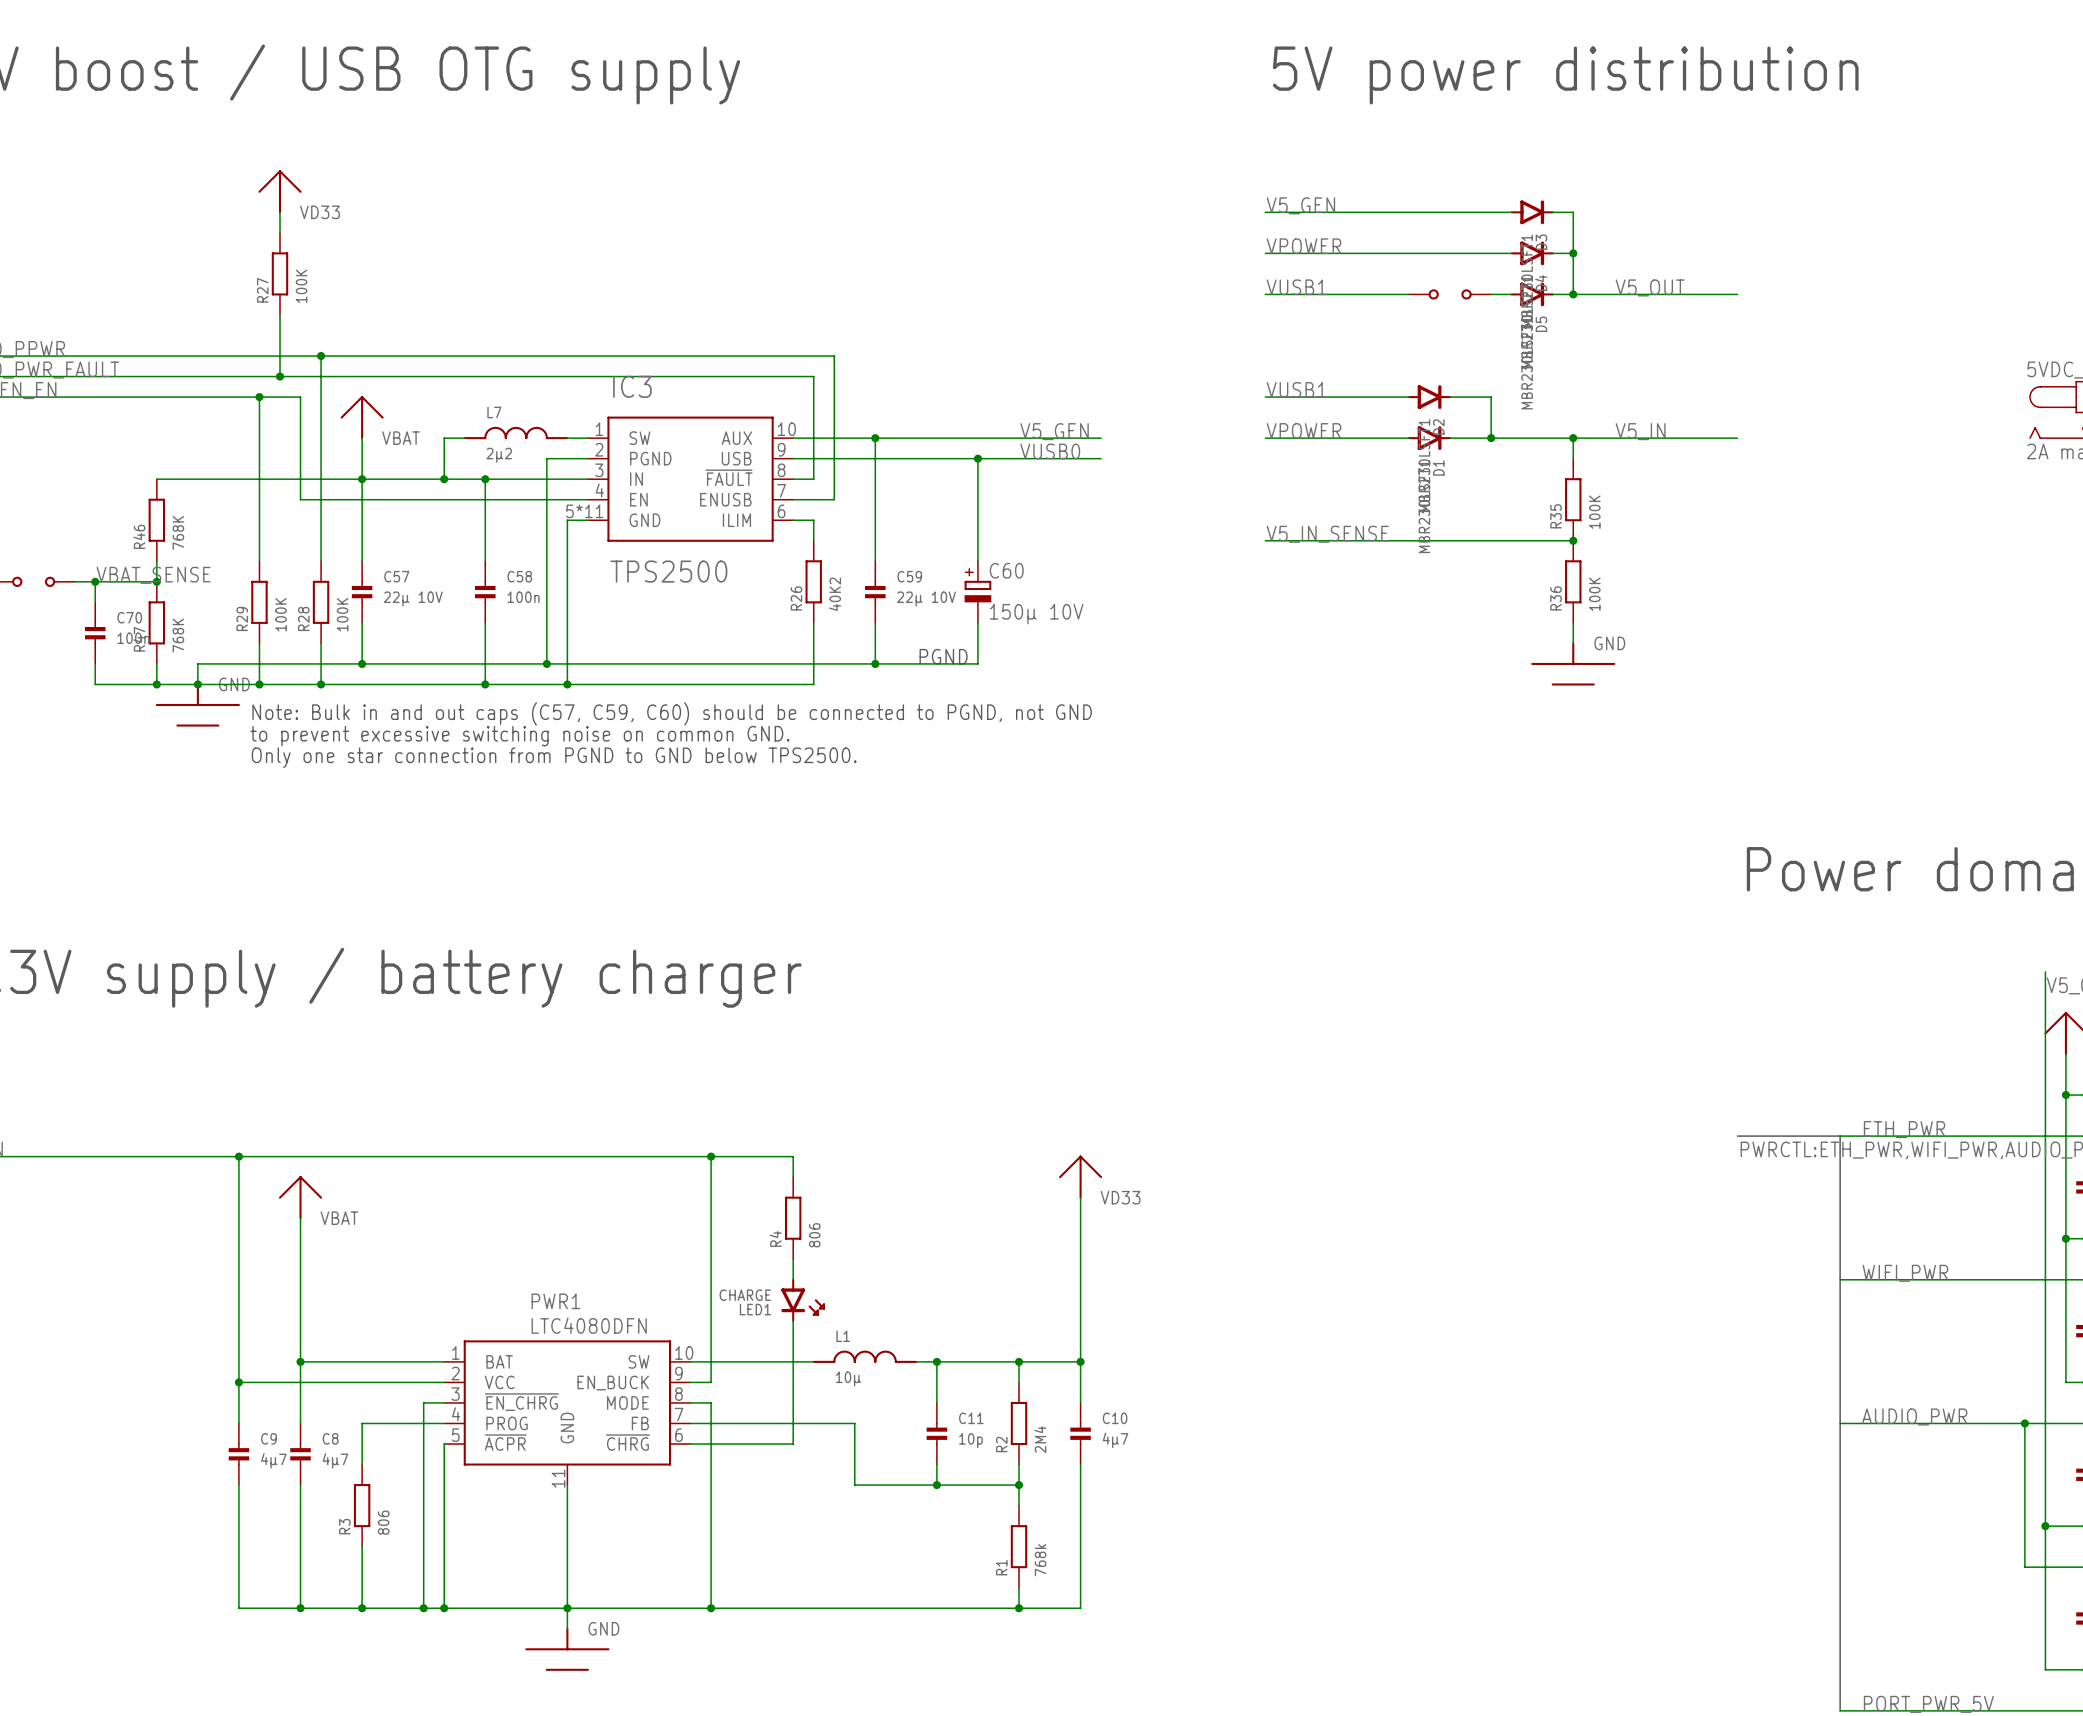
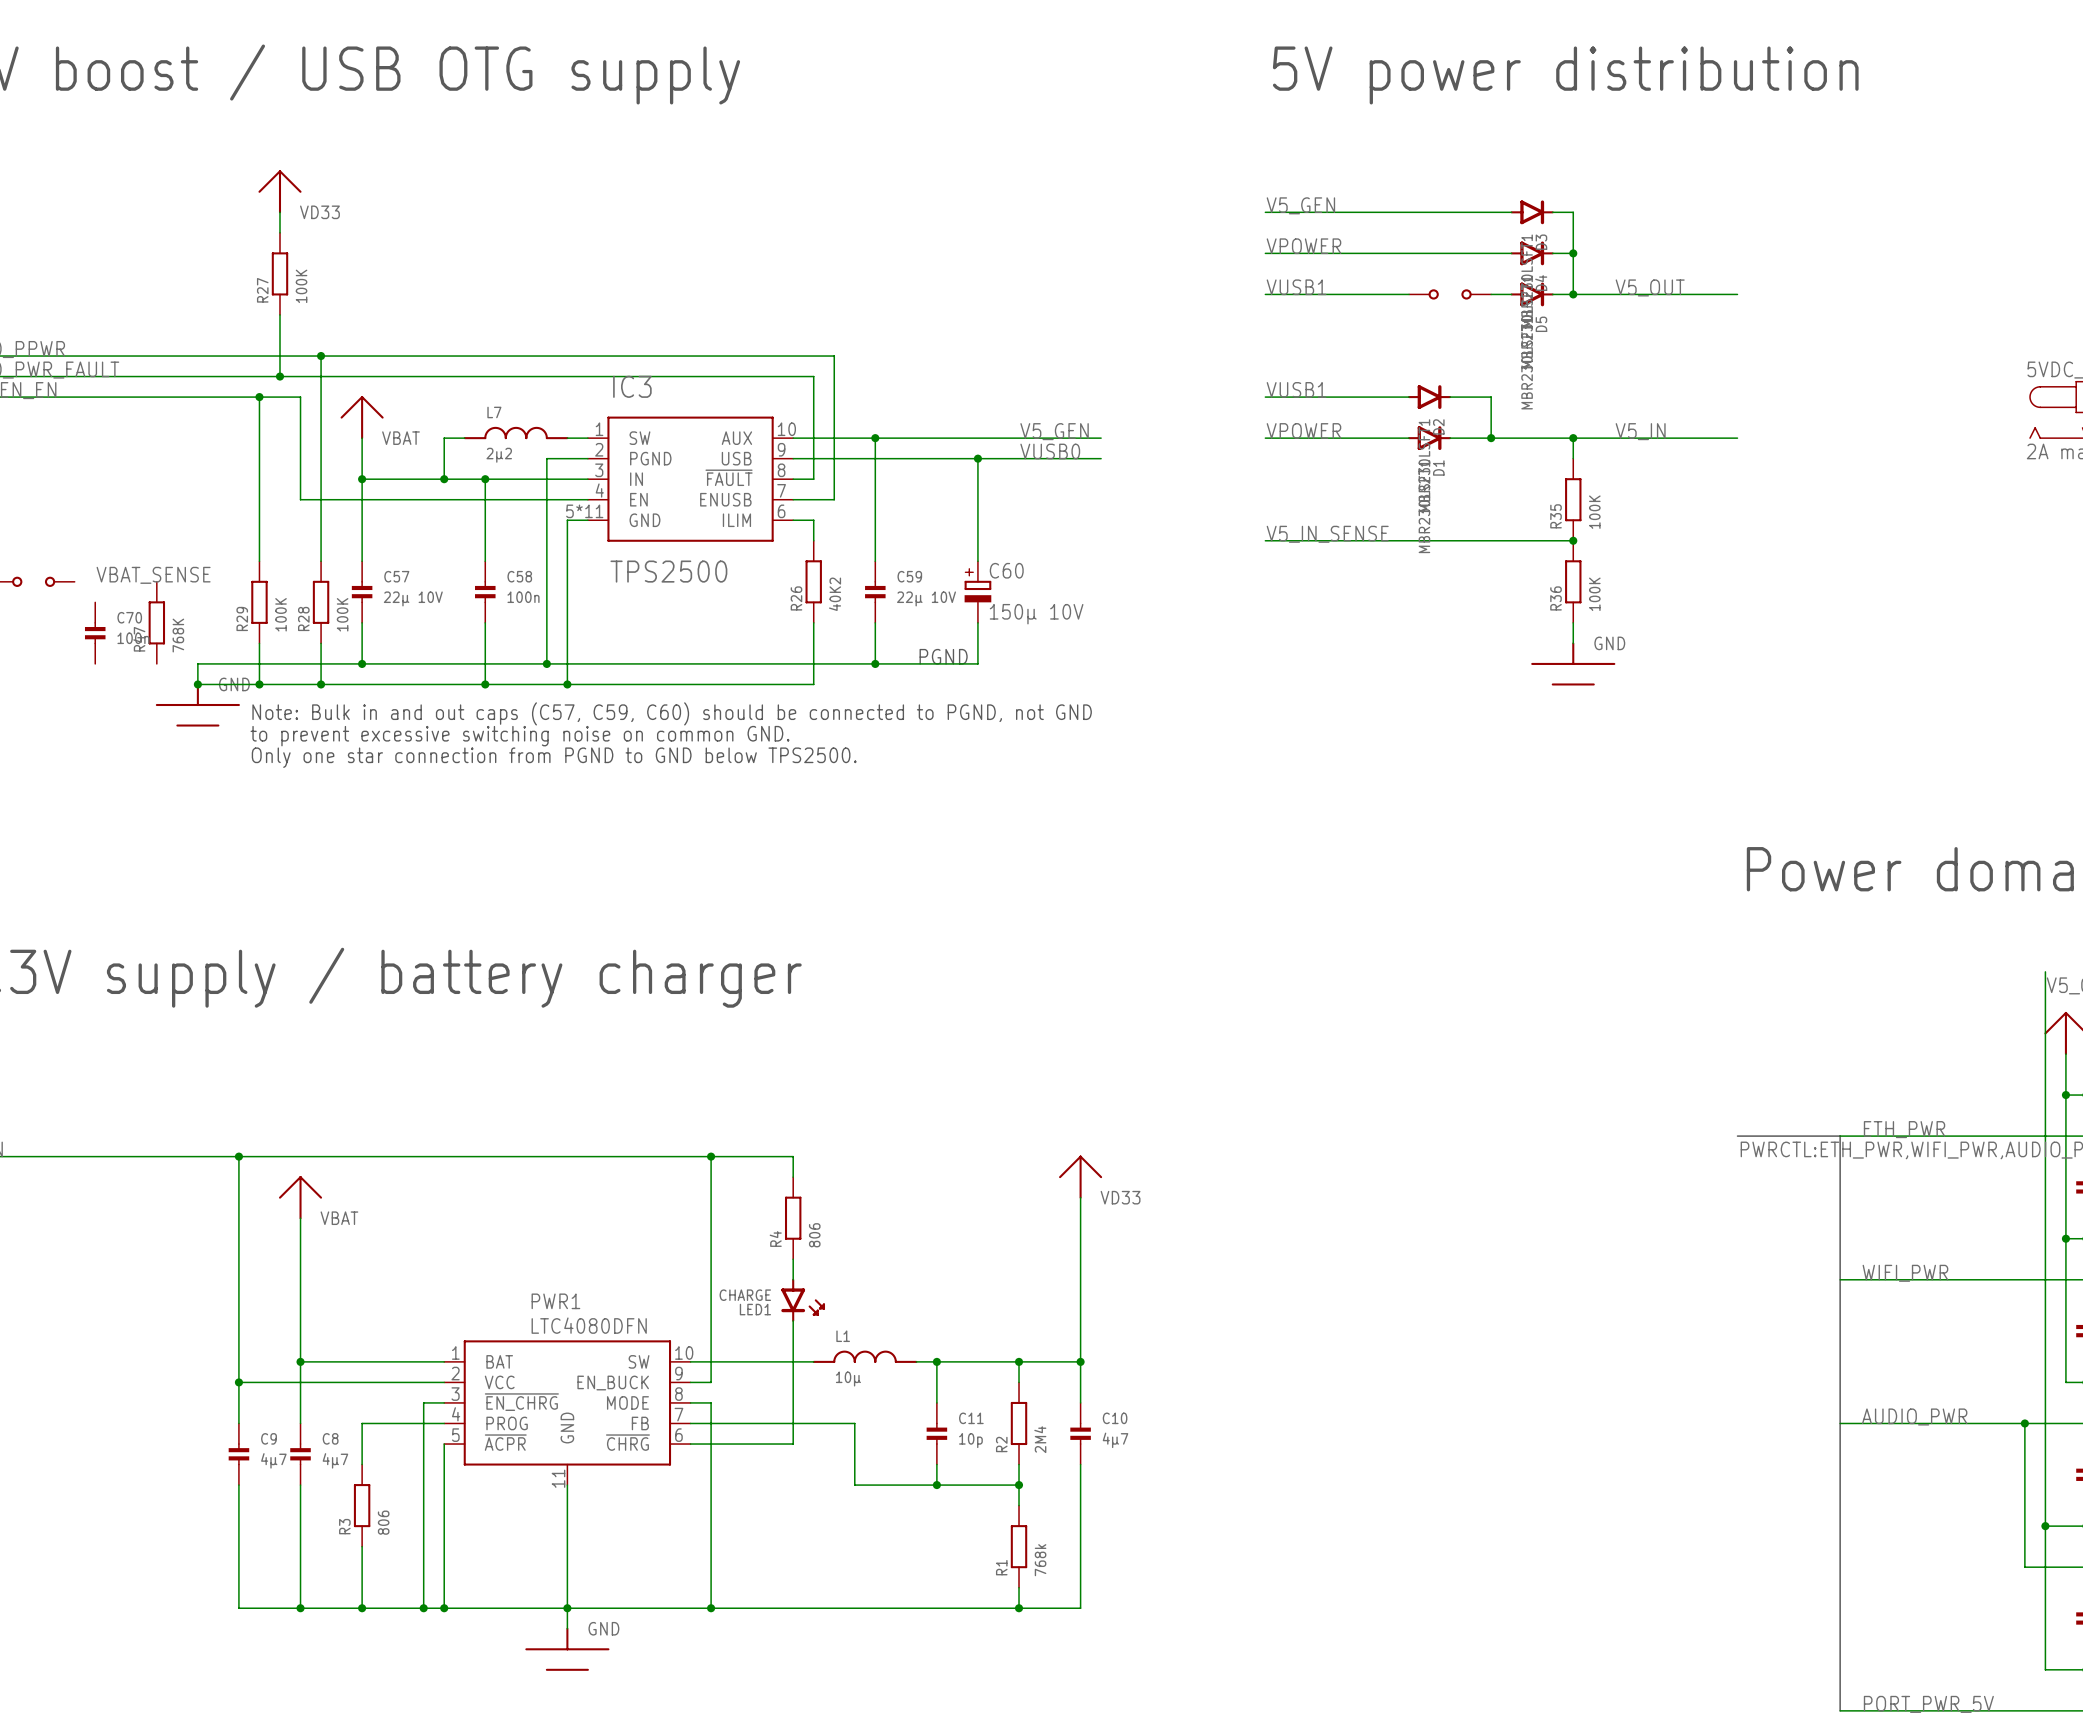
wire: (156, 479) (362, 479) -> none
R46: 768K (156, 520) -> none
wire: (156, 561) (156, 581) (74, 581) -> none
wire: (95, 581) (95, 602) -> none
junction: (95, 581) -> none
junction: (156, 581) -> none
wire: (95, 663) (95, 684) (197, 684) -> none
wire: (156, 663) (156, 684) -> none
junction: (156, 684) -> none

